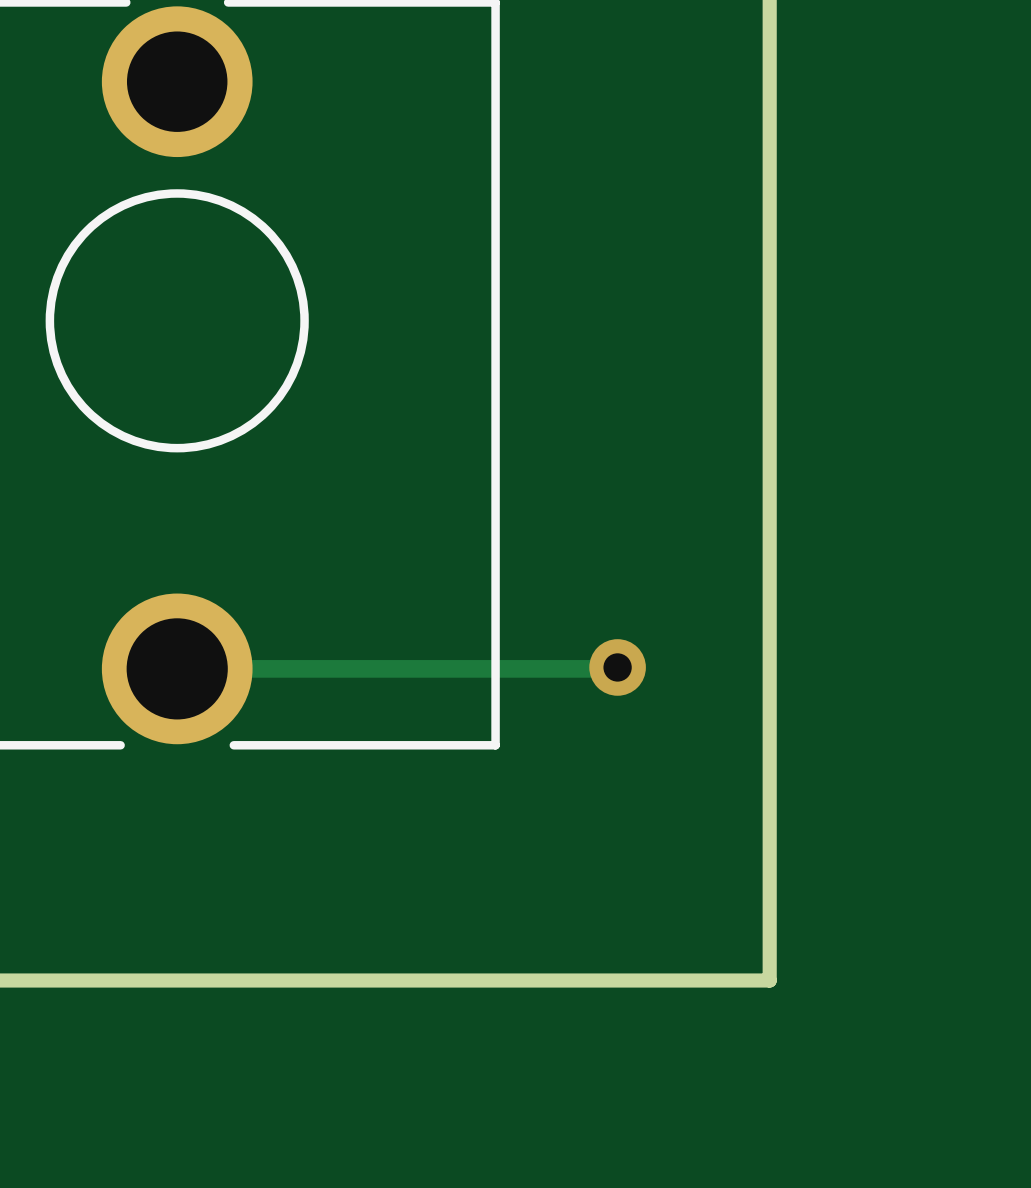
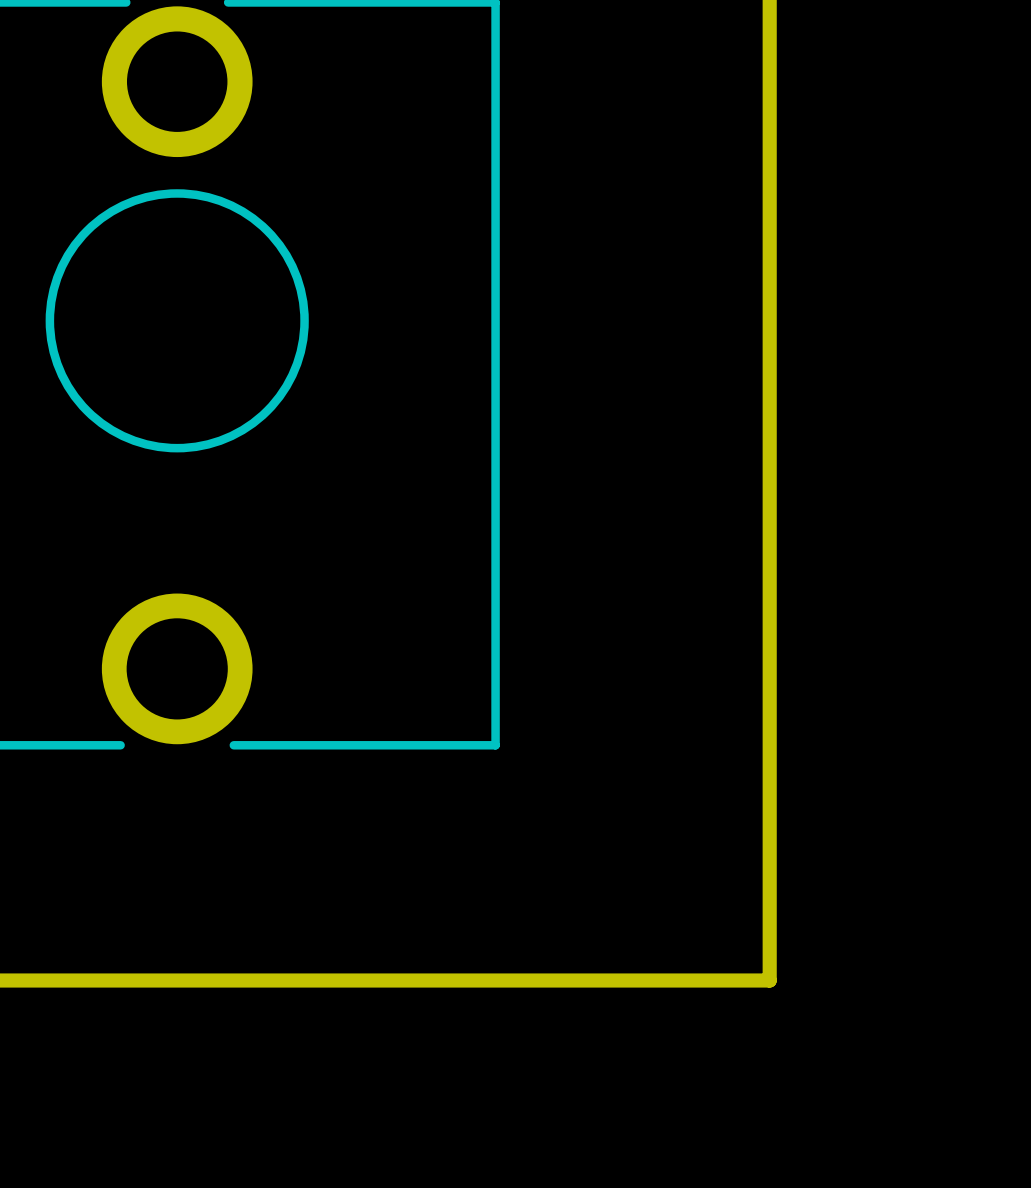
track: (617, 667) (177, 668) -> none
via: (617, 667) -> none

